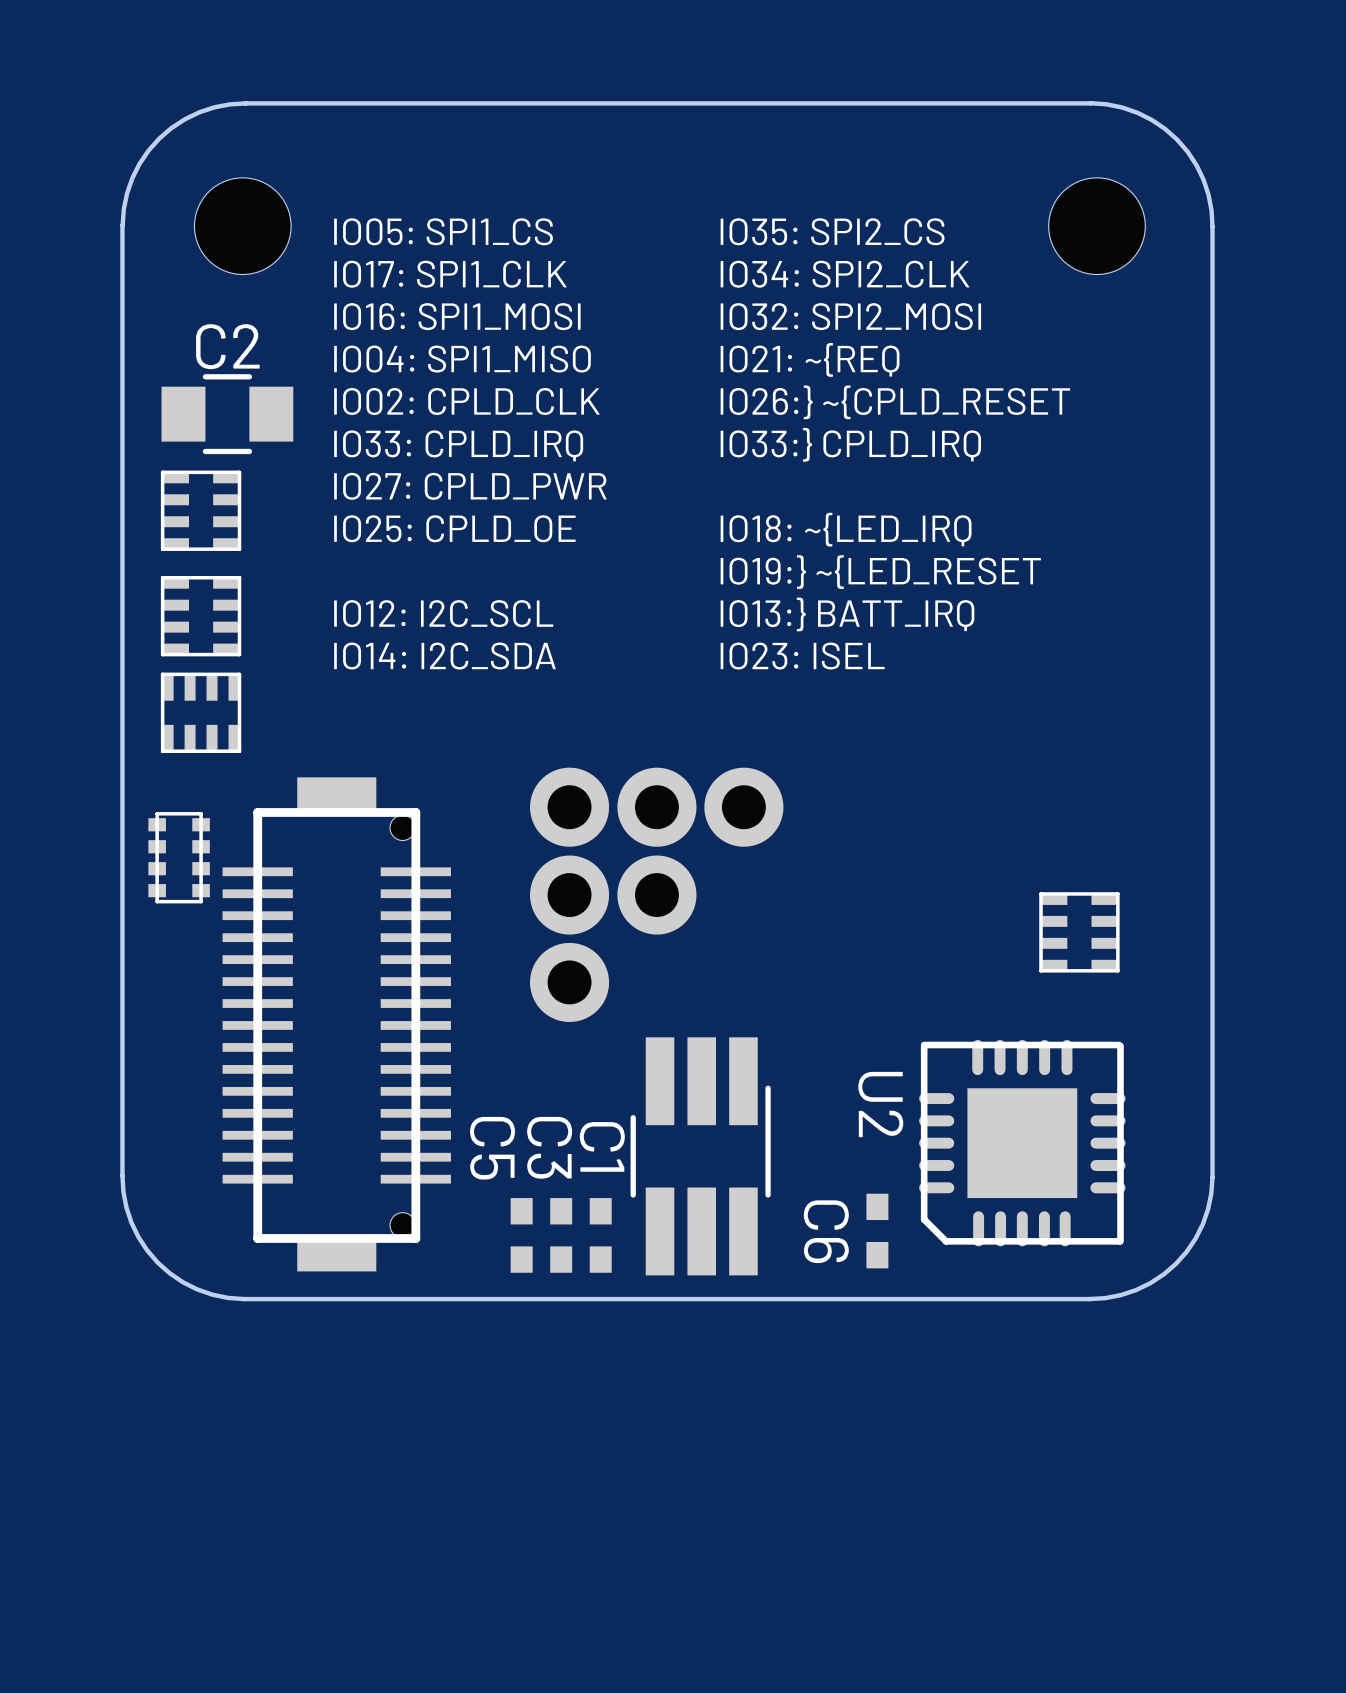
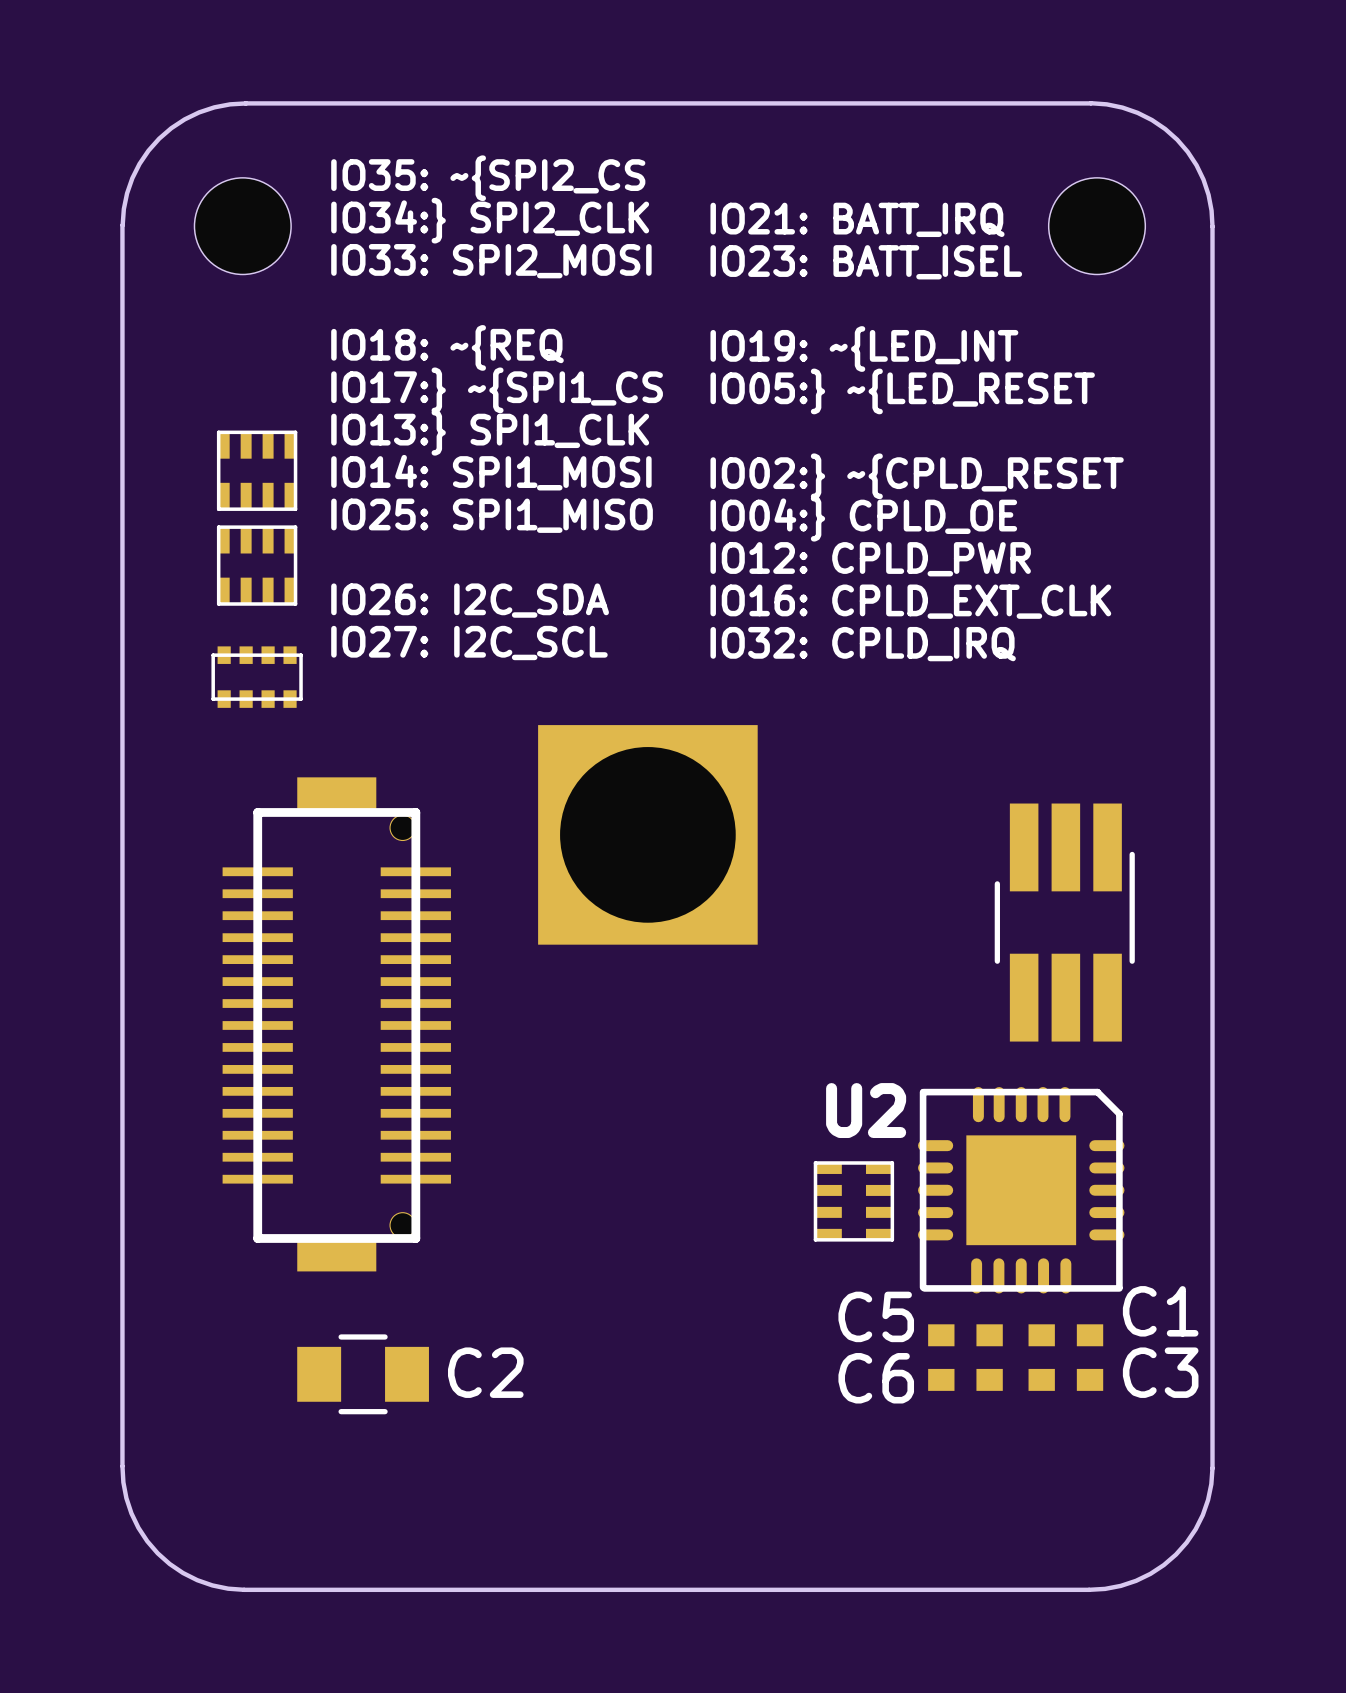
text: none -> IO35: ~{SPI2_CS (488, 178)
text: none -> IO34:} SPI2_CLK (490, 220)
text: none -> IO21: BATT_IRQ (857, 219)
text: IO05: SPI1_CS (443, 231) -> none
text: IO35: SPI2_CS (832, 231) -> none
text: none -> IO33: SPI2_MOSI (491, 261)
text: none -> IO23: BATT_ISEL (866, 262)
text: IO17: SPI1_CLK (450, 274) -> none
text: IO34: SPI2_CLK (844, 274) -> none
text: IO16: SPI1_MOSI (457, 316) -> none
text: IO32: SPI2_MOSI (850, 316) -> none
text: none -> IO18: ~{REQ (447, 347)
C2 name position: C2 (227, 346) -> C2 (485, 1372)
text: IO04: SPI1_MISO (462, 359) -> IO17:} ~{SPI1_CS (497, 390)
text: IO21: ~{REQ (810, 359) -> IO19: ~{LED_INT (864, 349)
text: IO02: CPLD_CLK (466, 401) -> IO13:} SPI1_CLK (490, 432)
text: IO26:} ~{CPLD_RESET (895, 402) -> IO05:} ~{LED_RESET (902, 391)
C2 position: (227, 414) -> (363, 1374)
text: IO33:} CPLD_IRQ (850, 444) -> IO02:} ~{CPLD_RESET (917, 476)
text: IO33: CPLD_IRQ (458, 445) -> none
part: none -> (257, 470)
text: none -> IO14: SPI1_MOSI (491, 472)
text: IO27: CPLD_PWR (470, 486) -> none
part: (201, 510) -> none
text: none -> IO04:} CPLD_OE (863, 518)
text: IO25: CPLD_OE (454, 528) -> IO25: SPI1_MISO (492, 515)
text: IO18: ~{LED_IRQ (846, 529) -> IO12: CPLD_PWR (870, 559)
part: none -> (257, 565)
text: IO19:} ~{LED_RESET (880, 572) -> none
text: none -> IO26: I2C_SDA (470, 600)
text: none -> IO16: CPLD_EXT_CLK (910, 601)
text: IO12: I2C_SCL (443, 613) -> none
text: IO13:} BATT_IRQ (847, 614) -> IO32: CPLD_IRQ (863, 644)
part: (201, 616) -> none
text: none -> IO27: I2C_SCL (469, 643)
text: IO14: I2C_SDA (444, 656) -> none
text: IO23: ISEL (802, 656) -> none
part: (201, 712) -> none
part: none -> (647, 834)
part rotation: 0° (179, 857) -> 90° clockwise (257, 677)
part position: (179, 857) -> (257, 677)
part footprint: [1039, 892, 1120, 973] -> [994, 803, 1135, 1042]
part: (656, 894) -> none
U2 rotation: 0° (1022, 1143) -> 180° (1021, 1190)
C5 name position: C5 (492, 1148) -> C5 (876, 1316)
part: (700, 1156) -> none
board edge: (122, 1175) (123, 1191) (131, 1222) (147, 1250) (157, 1262) (169, 1273) (197, 1289) (212, 1294) (244, 1299) (1105, 1298) (1120, 1295) (1150, 1283) (1175, 1263) (1186, 1251) (1202, 1224) (1208, 1209) (1212, 1177) -> (122, 1466) (123, 1482) (131, 1513) (147, 1541) (169, 1563) (182, 1572) (212, 1585) (228, 1588) (1089, 1589) (1120, 1585) (1150, 1573) (1175, 1554) (1195, 1529) (1208, 1499) (1212, 1468) (1212, 1177)
board edge: none -> (122, 1175) (122, 1465)
part: none -> (853, 1201)
C6 rotation: 0° (877, 1231) -> 90° clockwise (965, 1379)
C6 position: (877, 1231) -> (965, 1379)
C5 rotation: 0° (521, 1235) -> 90° clockwise (965, 1335)
C5 position: (521, 1235) -> (965, 1335)
C3 rotation: 0° (561, 1235) -> 90° clockwise (1065, 1379)
C3 position: (561, 1235) -> (1065, 1379)
C1 rotation: 0° (600, 1235) -> 90° clockwise (1065, 1335)
C1 position: (600, 1235) -> (1065, 1335)

